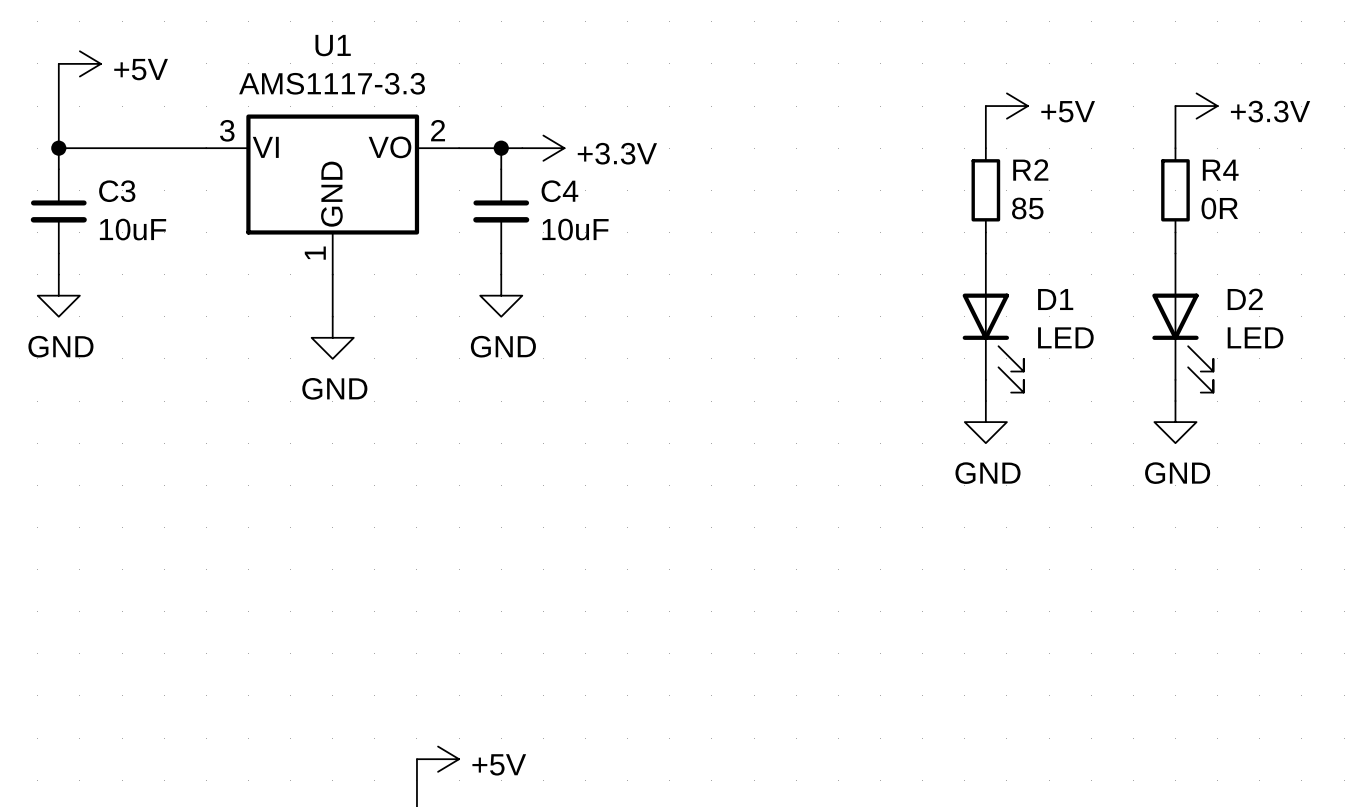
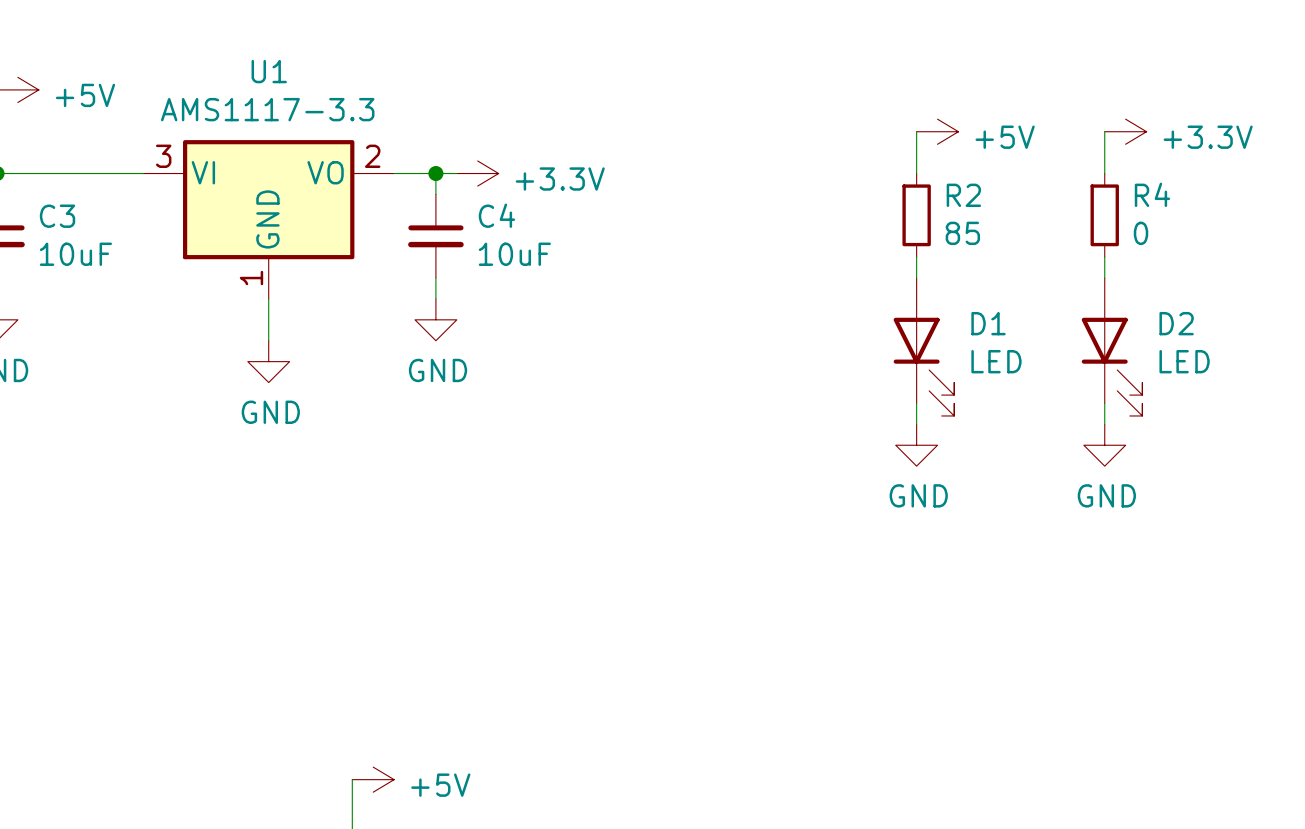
R4 value: 0R (1219, 208) -> 0 (1141, 233)

